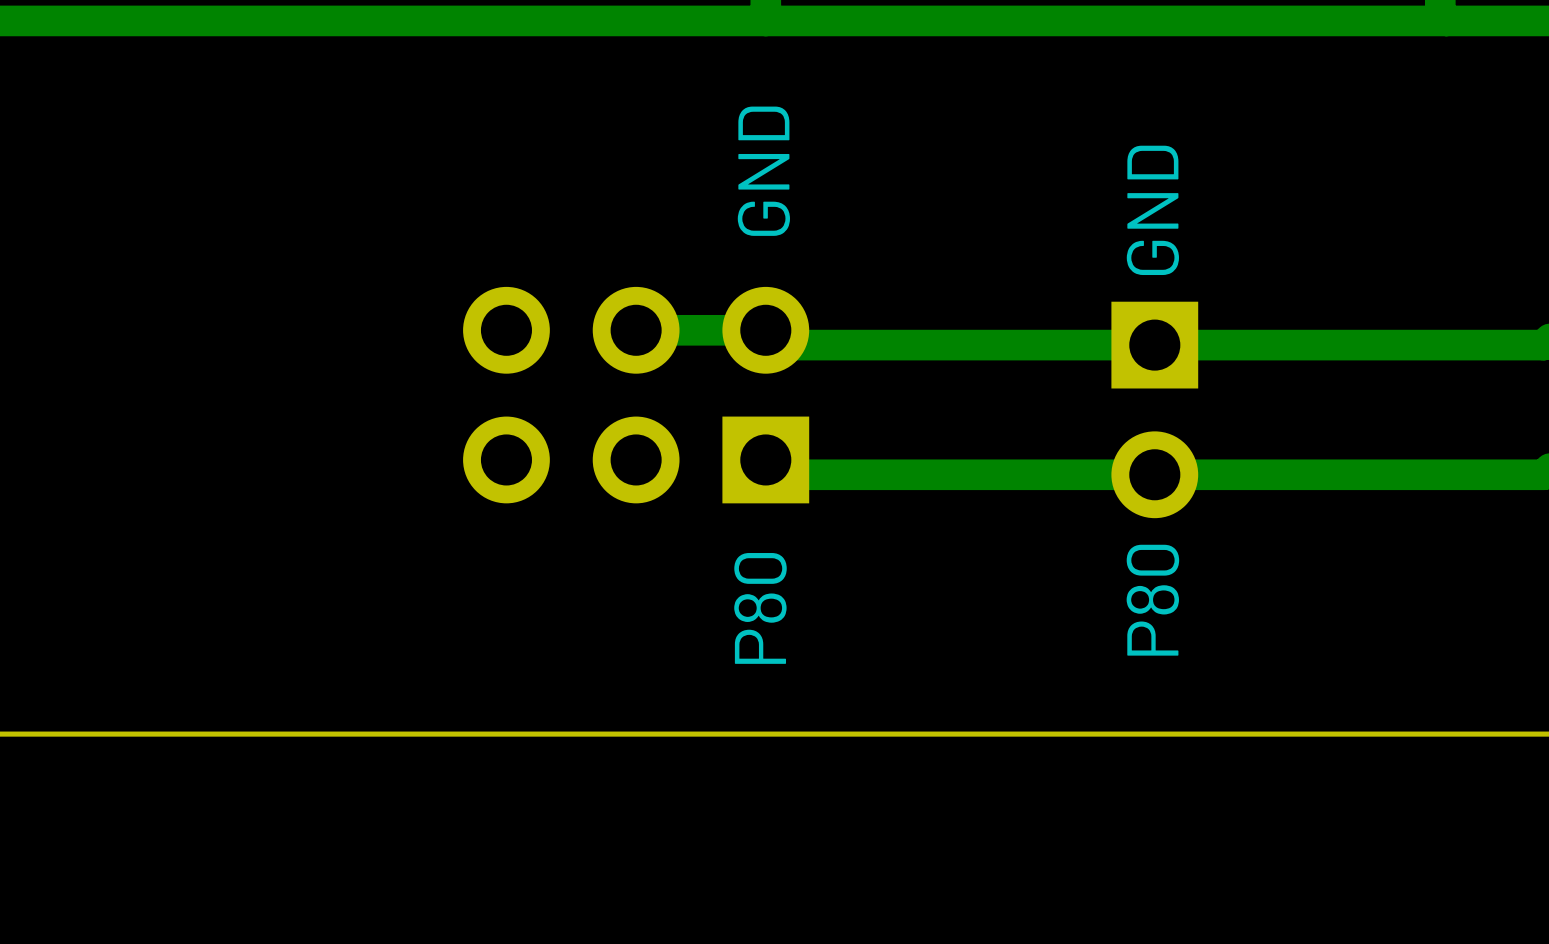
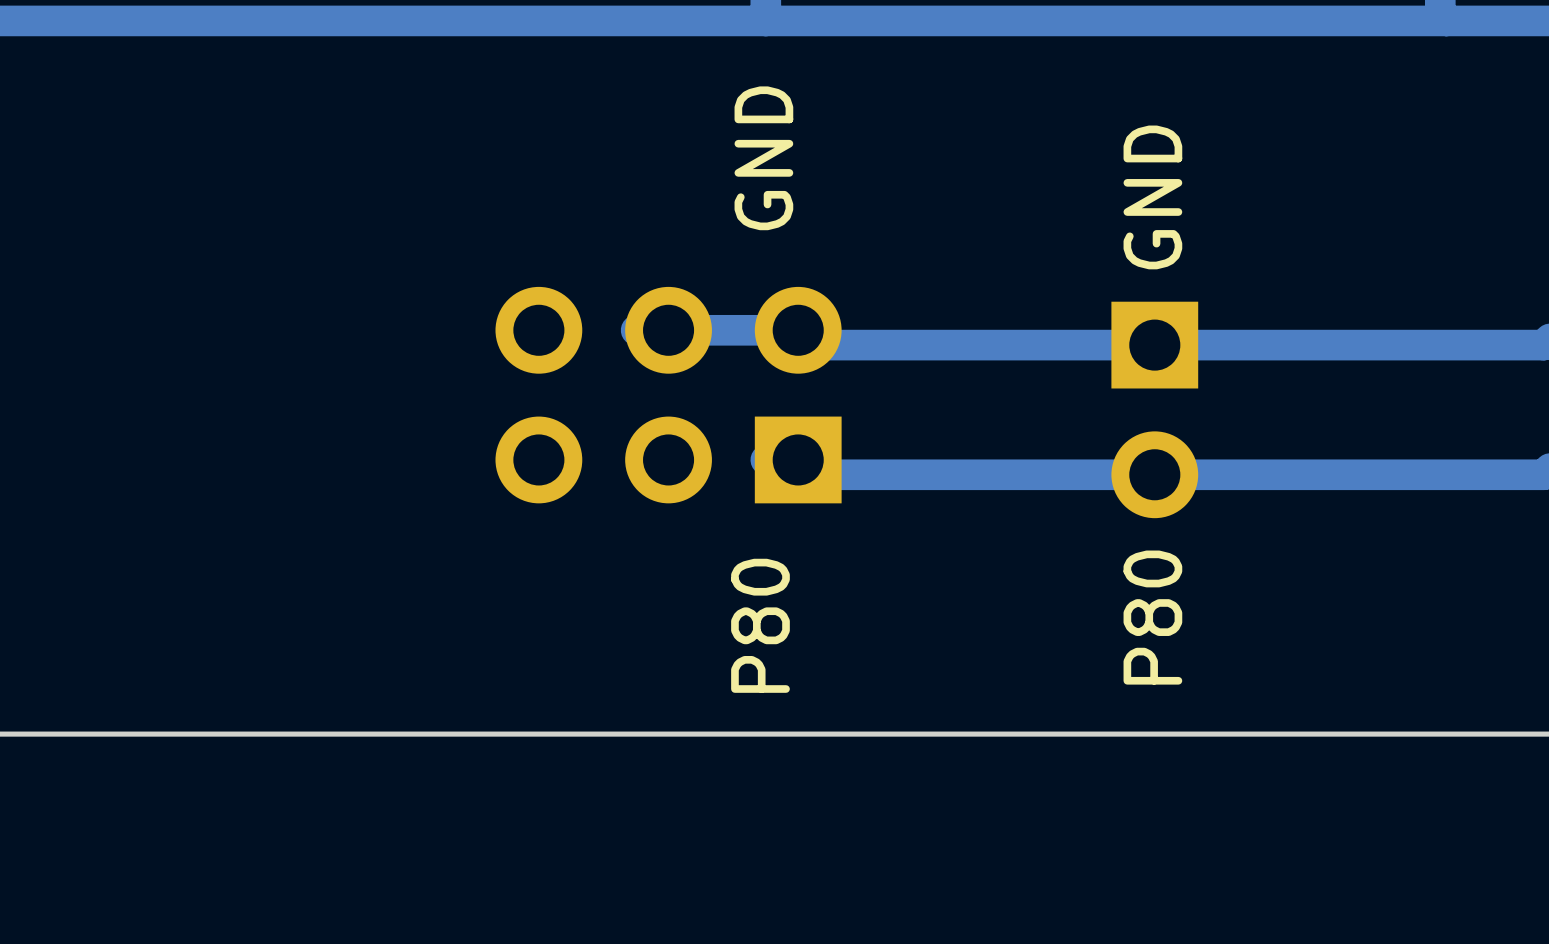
part position: (636, 395) -> (668, 395)

